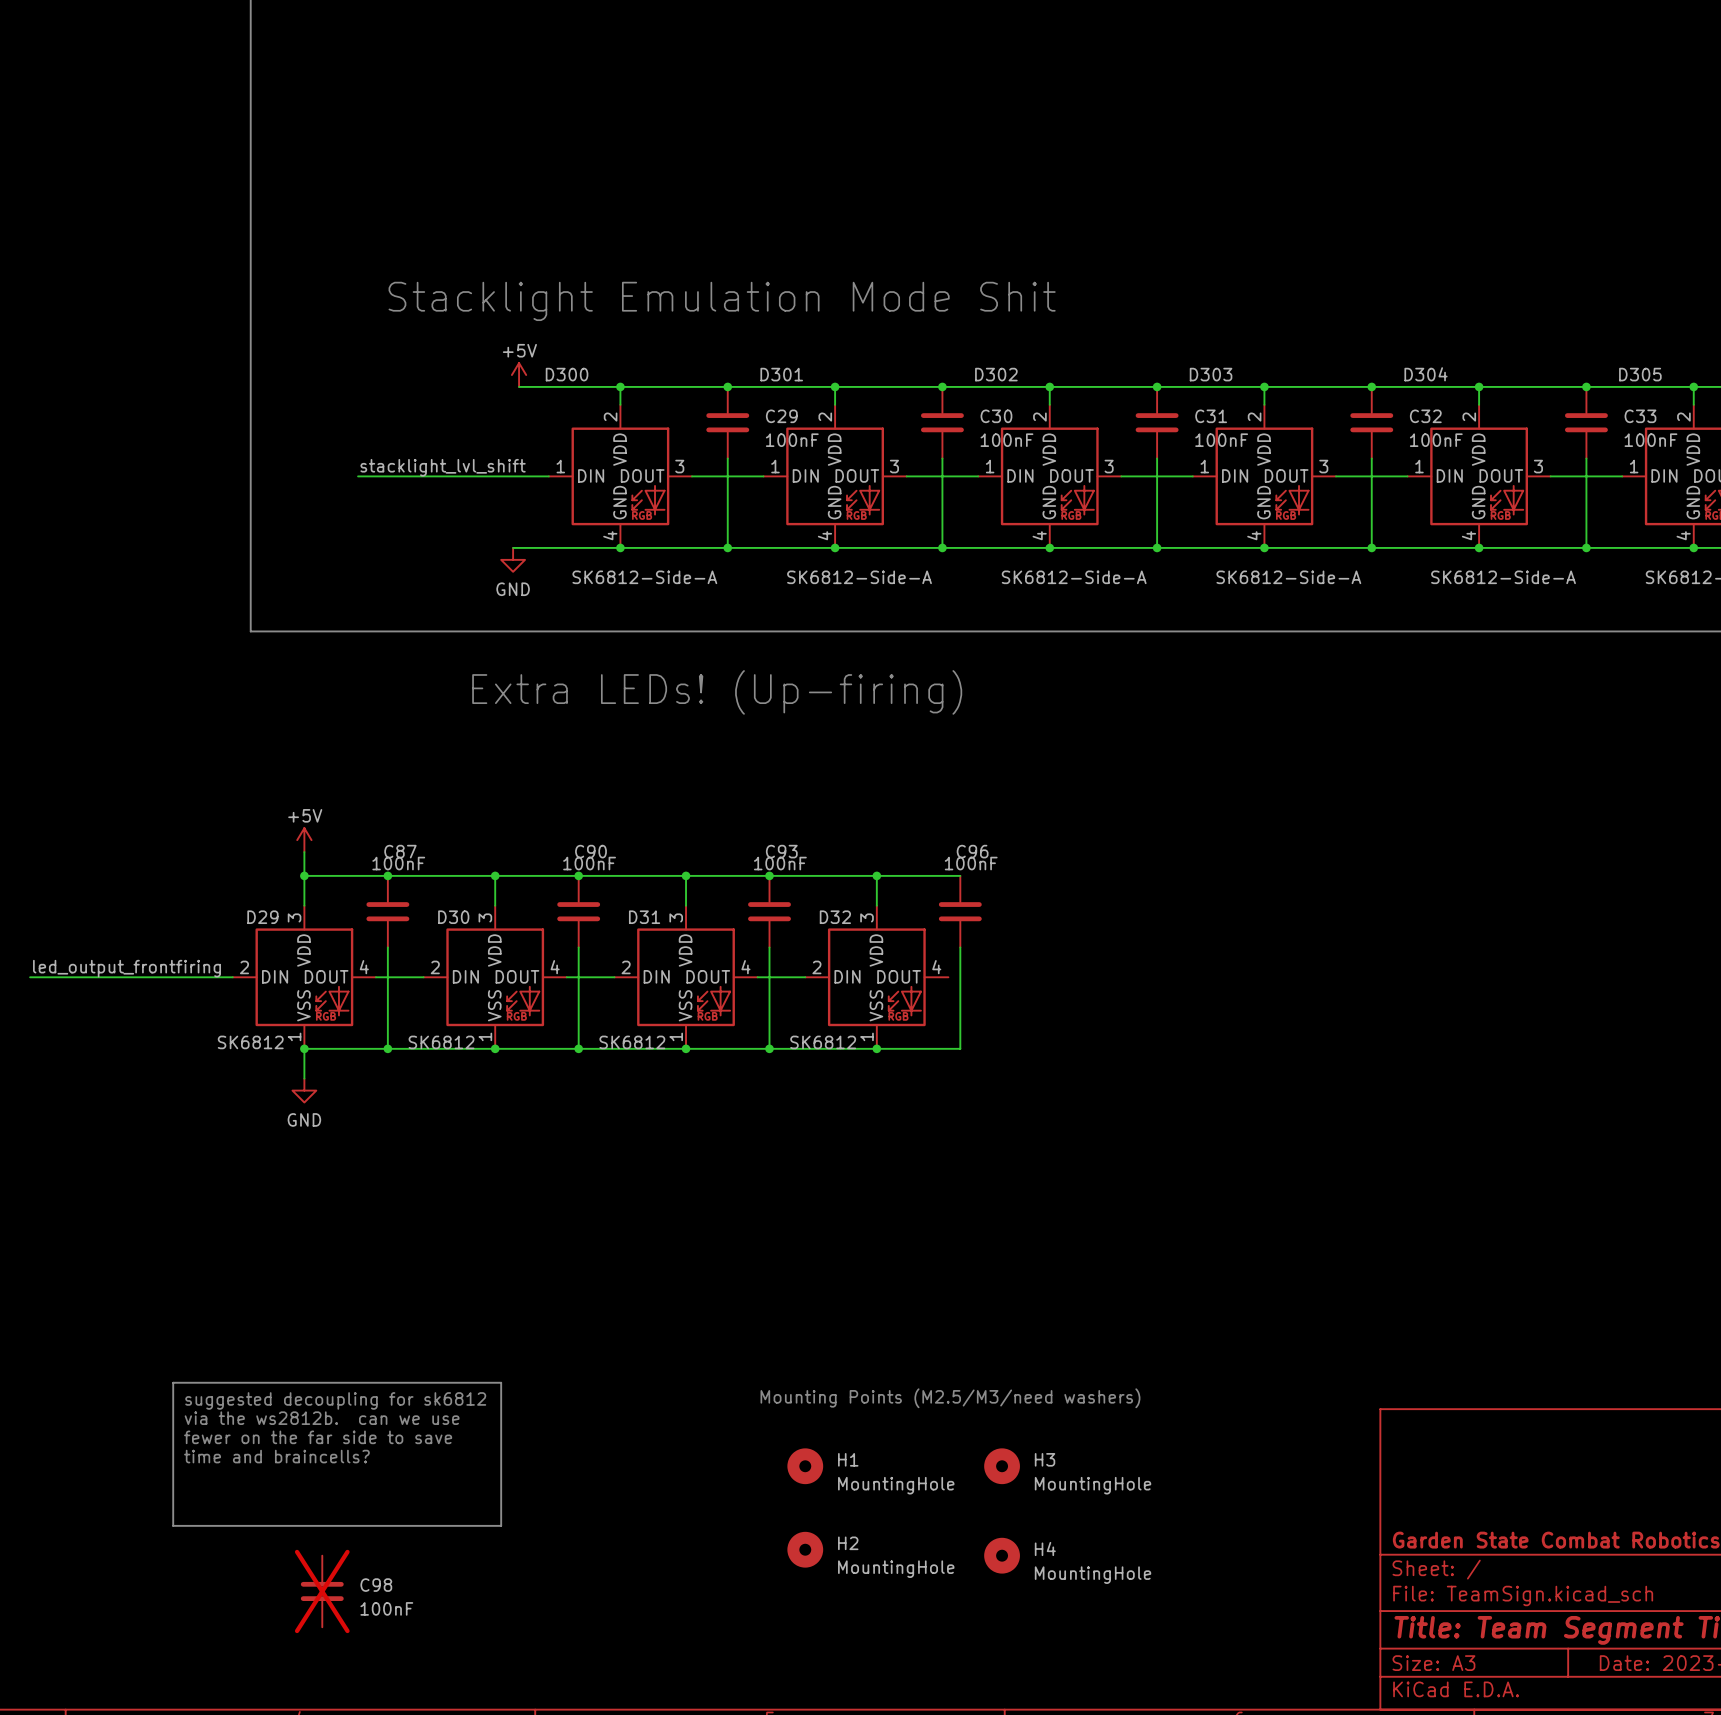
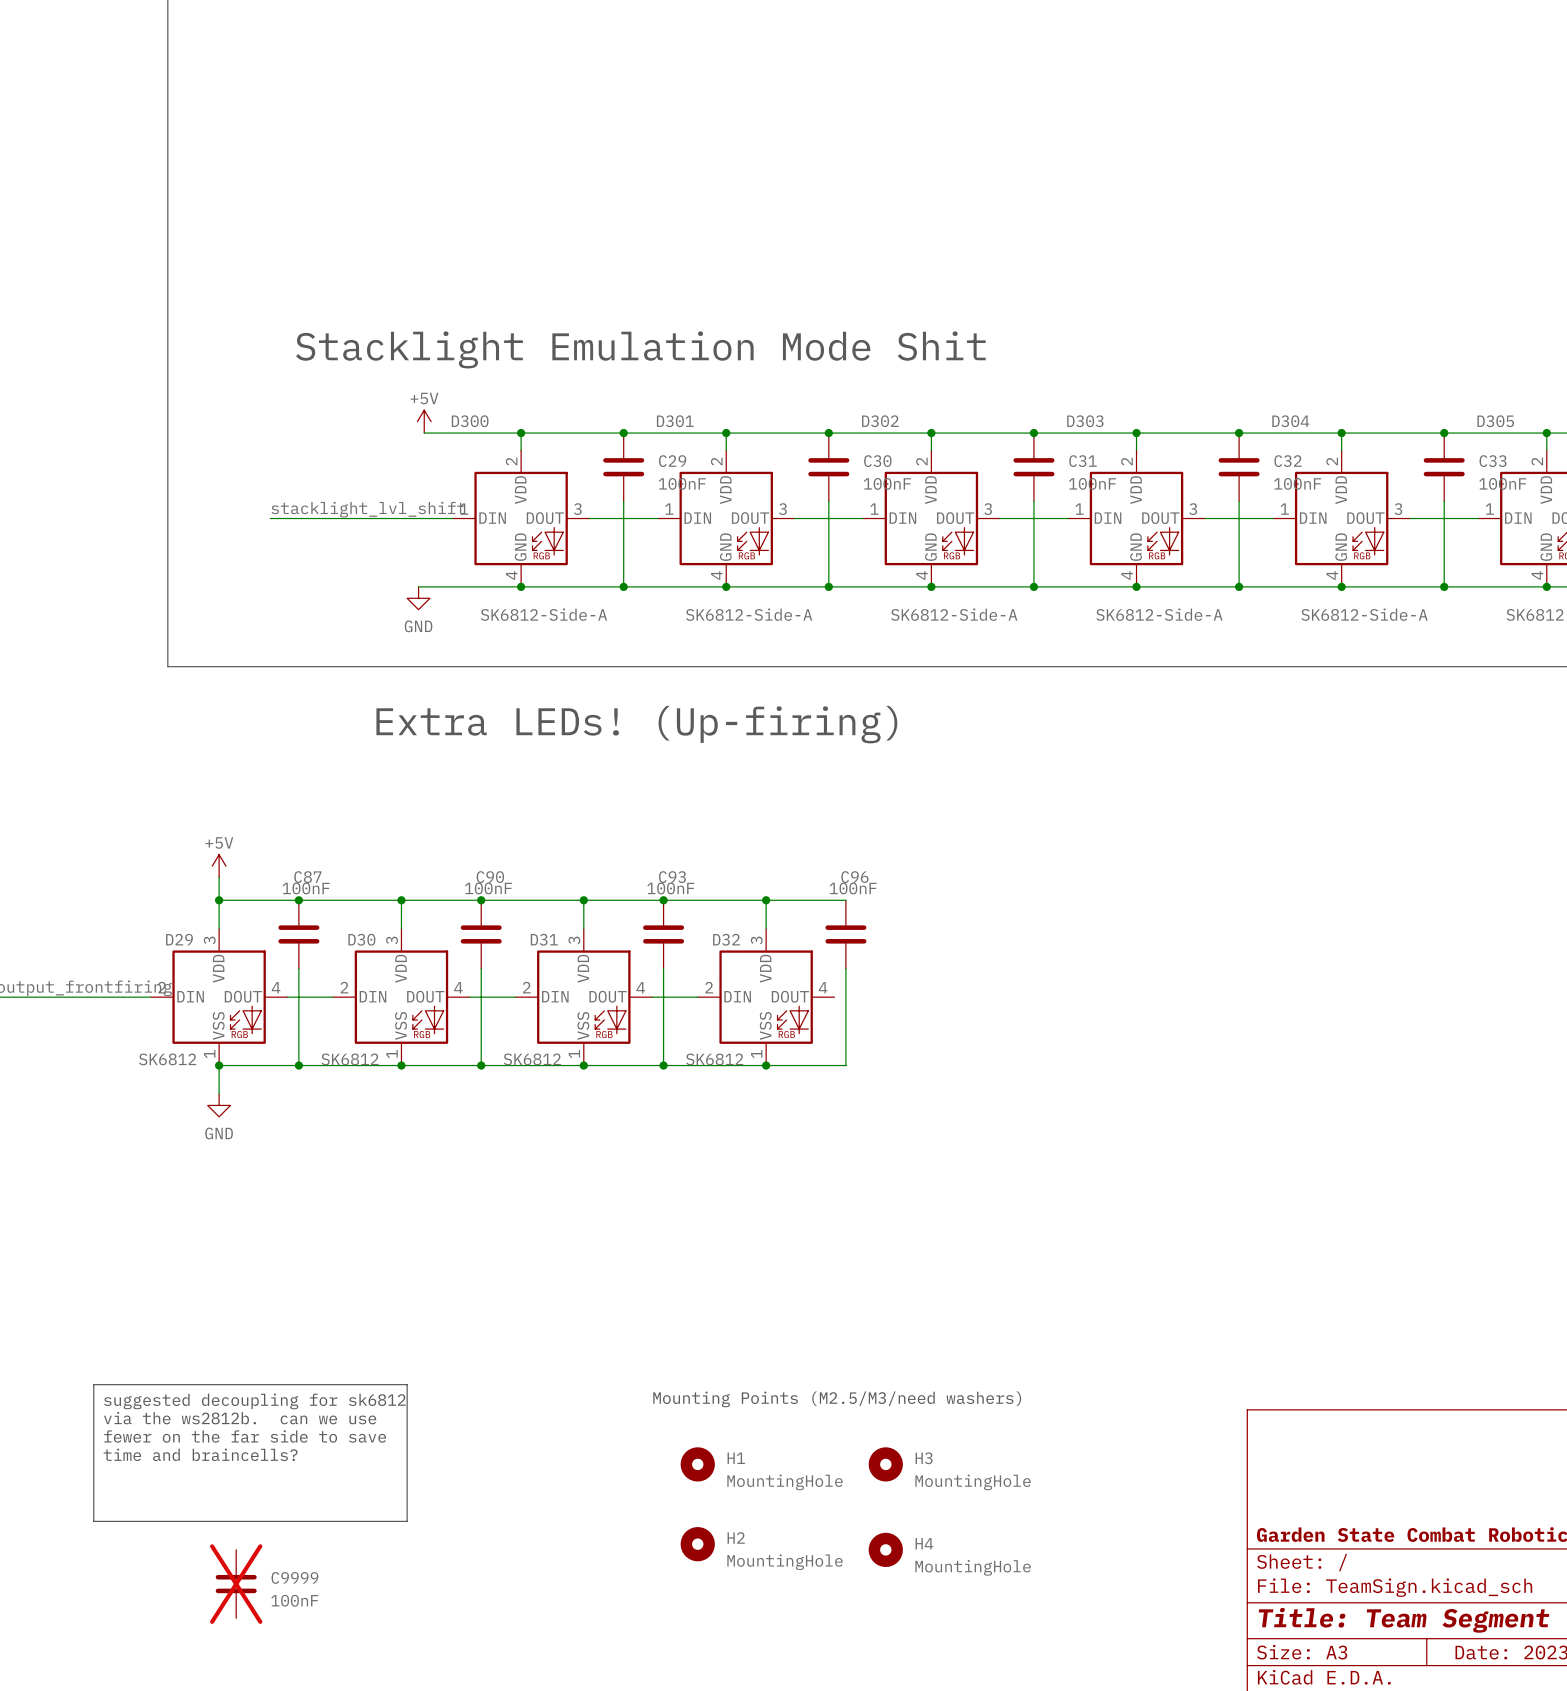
C98 name: C98 (376, 1585) -> C9999 (294, 1577)

